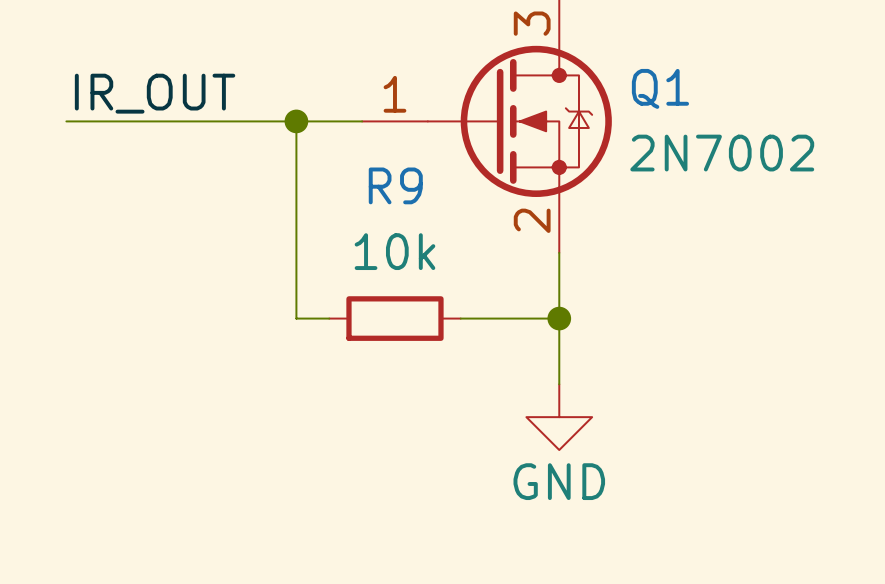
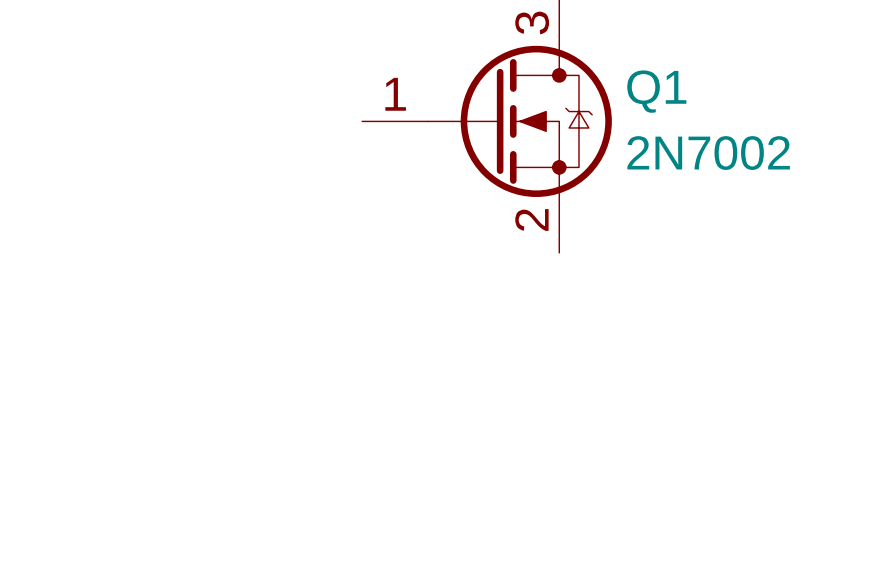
label: IR_OUT (155, 93) -> none
wire: (66, 121) (362, 121) -> none
wire: (296, 121) (296, 318) (329, 318) -> none
junction: (296, 121) -> none
wire: (559, 252) (559, 384) -> none
R9: 10k (394, 318) -> none
wire: (460, 318) (559, 318) -> none
junction: (559, 318) -> none
power symbol: GND (559, 417) -> none

